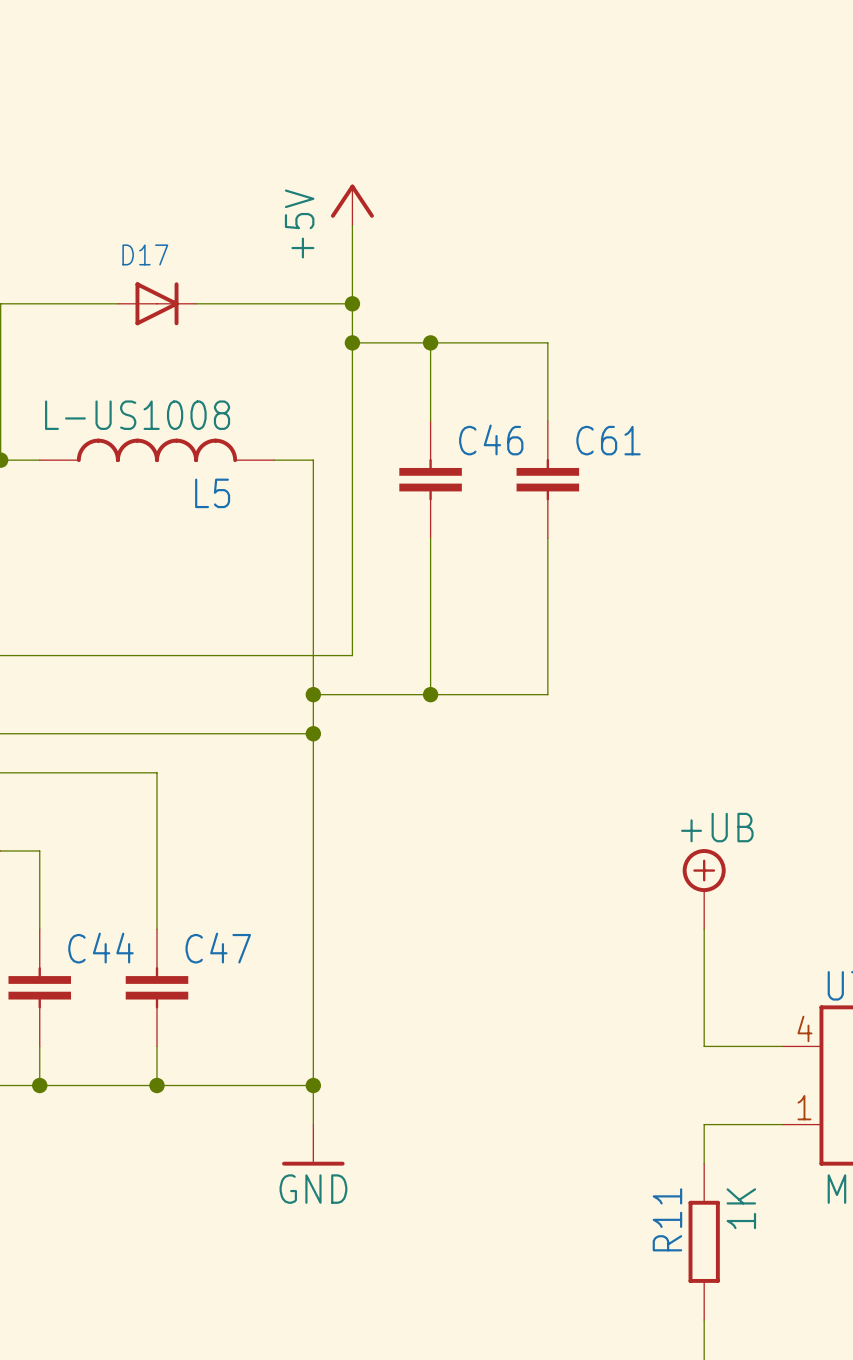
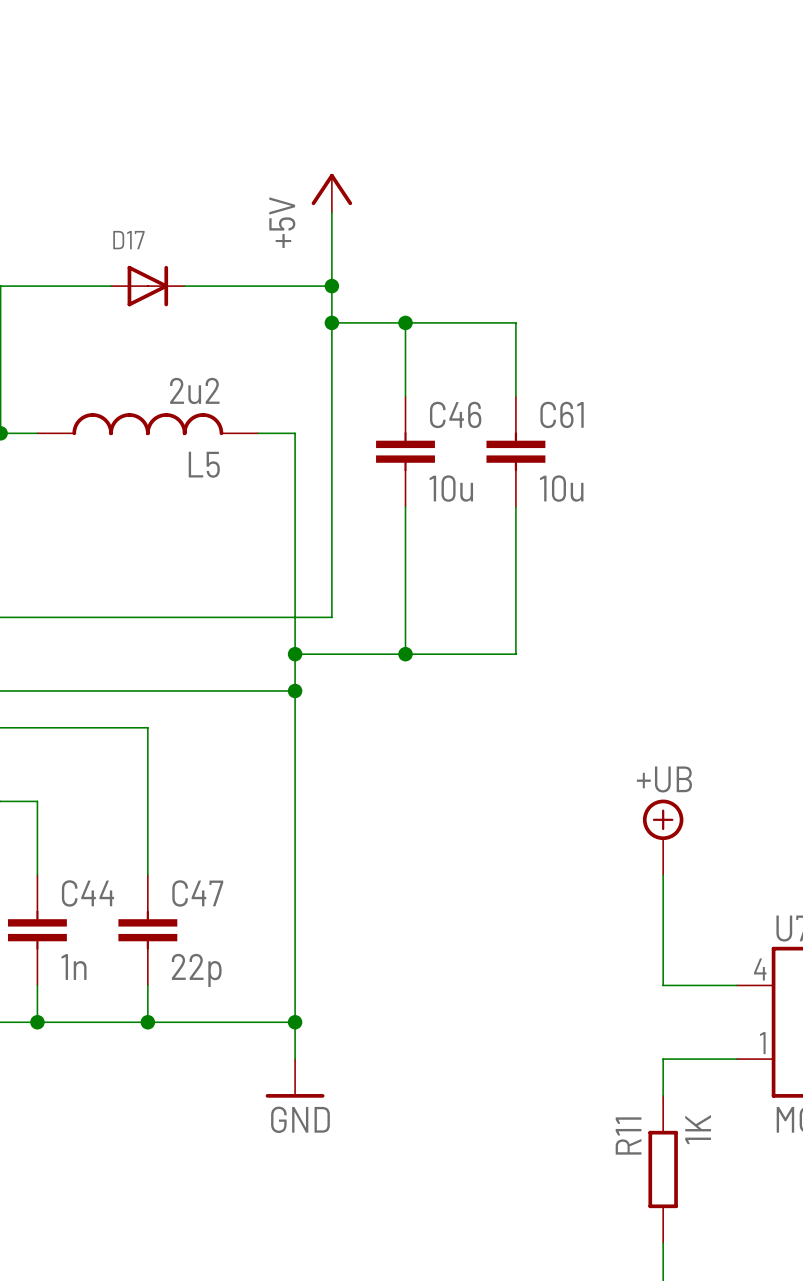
L5 value: L-US1008 (137, 415) -> 2u2 (194, 390)
C46 value: none -> 10u (451, 488)
C61 value: none -> 10u (561, 488)
C44 value: none -> 1n (73, 967)
C47 value: none -> 22p (196, 970)

